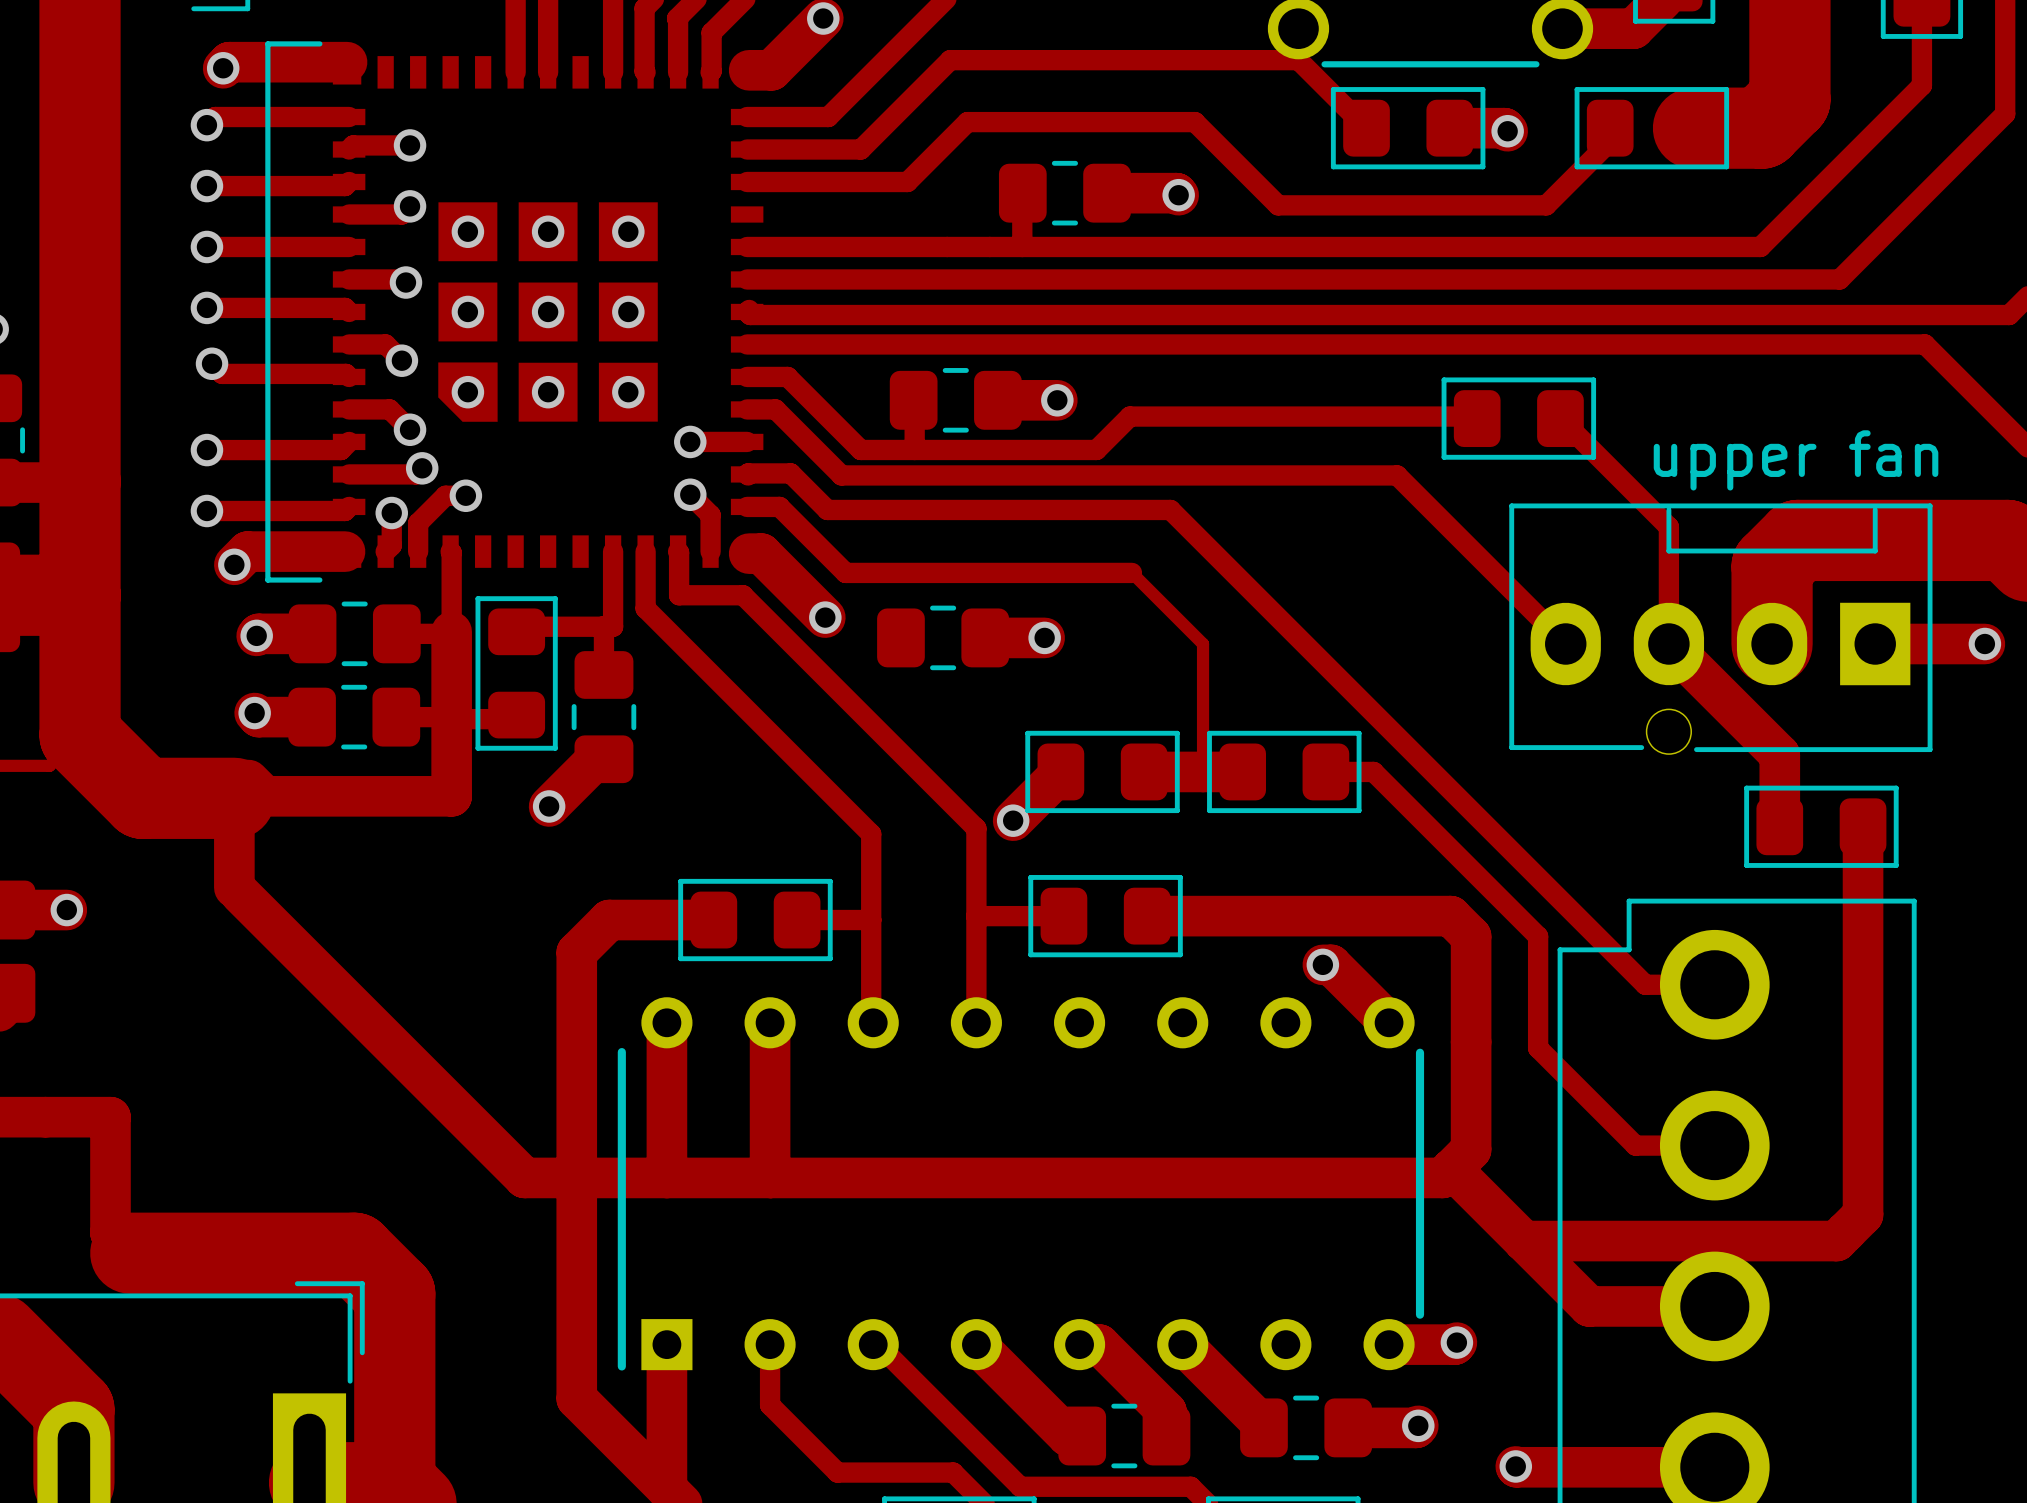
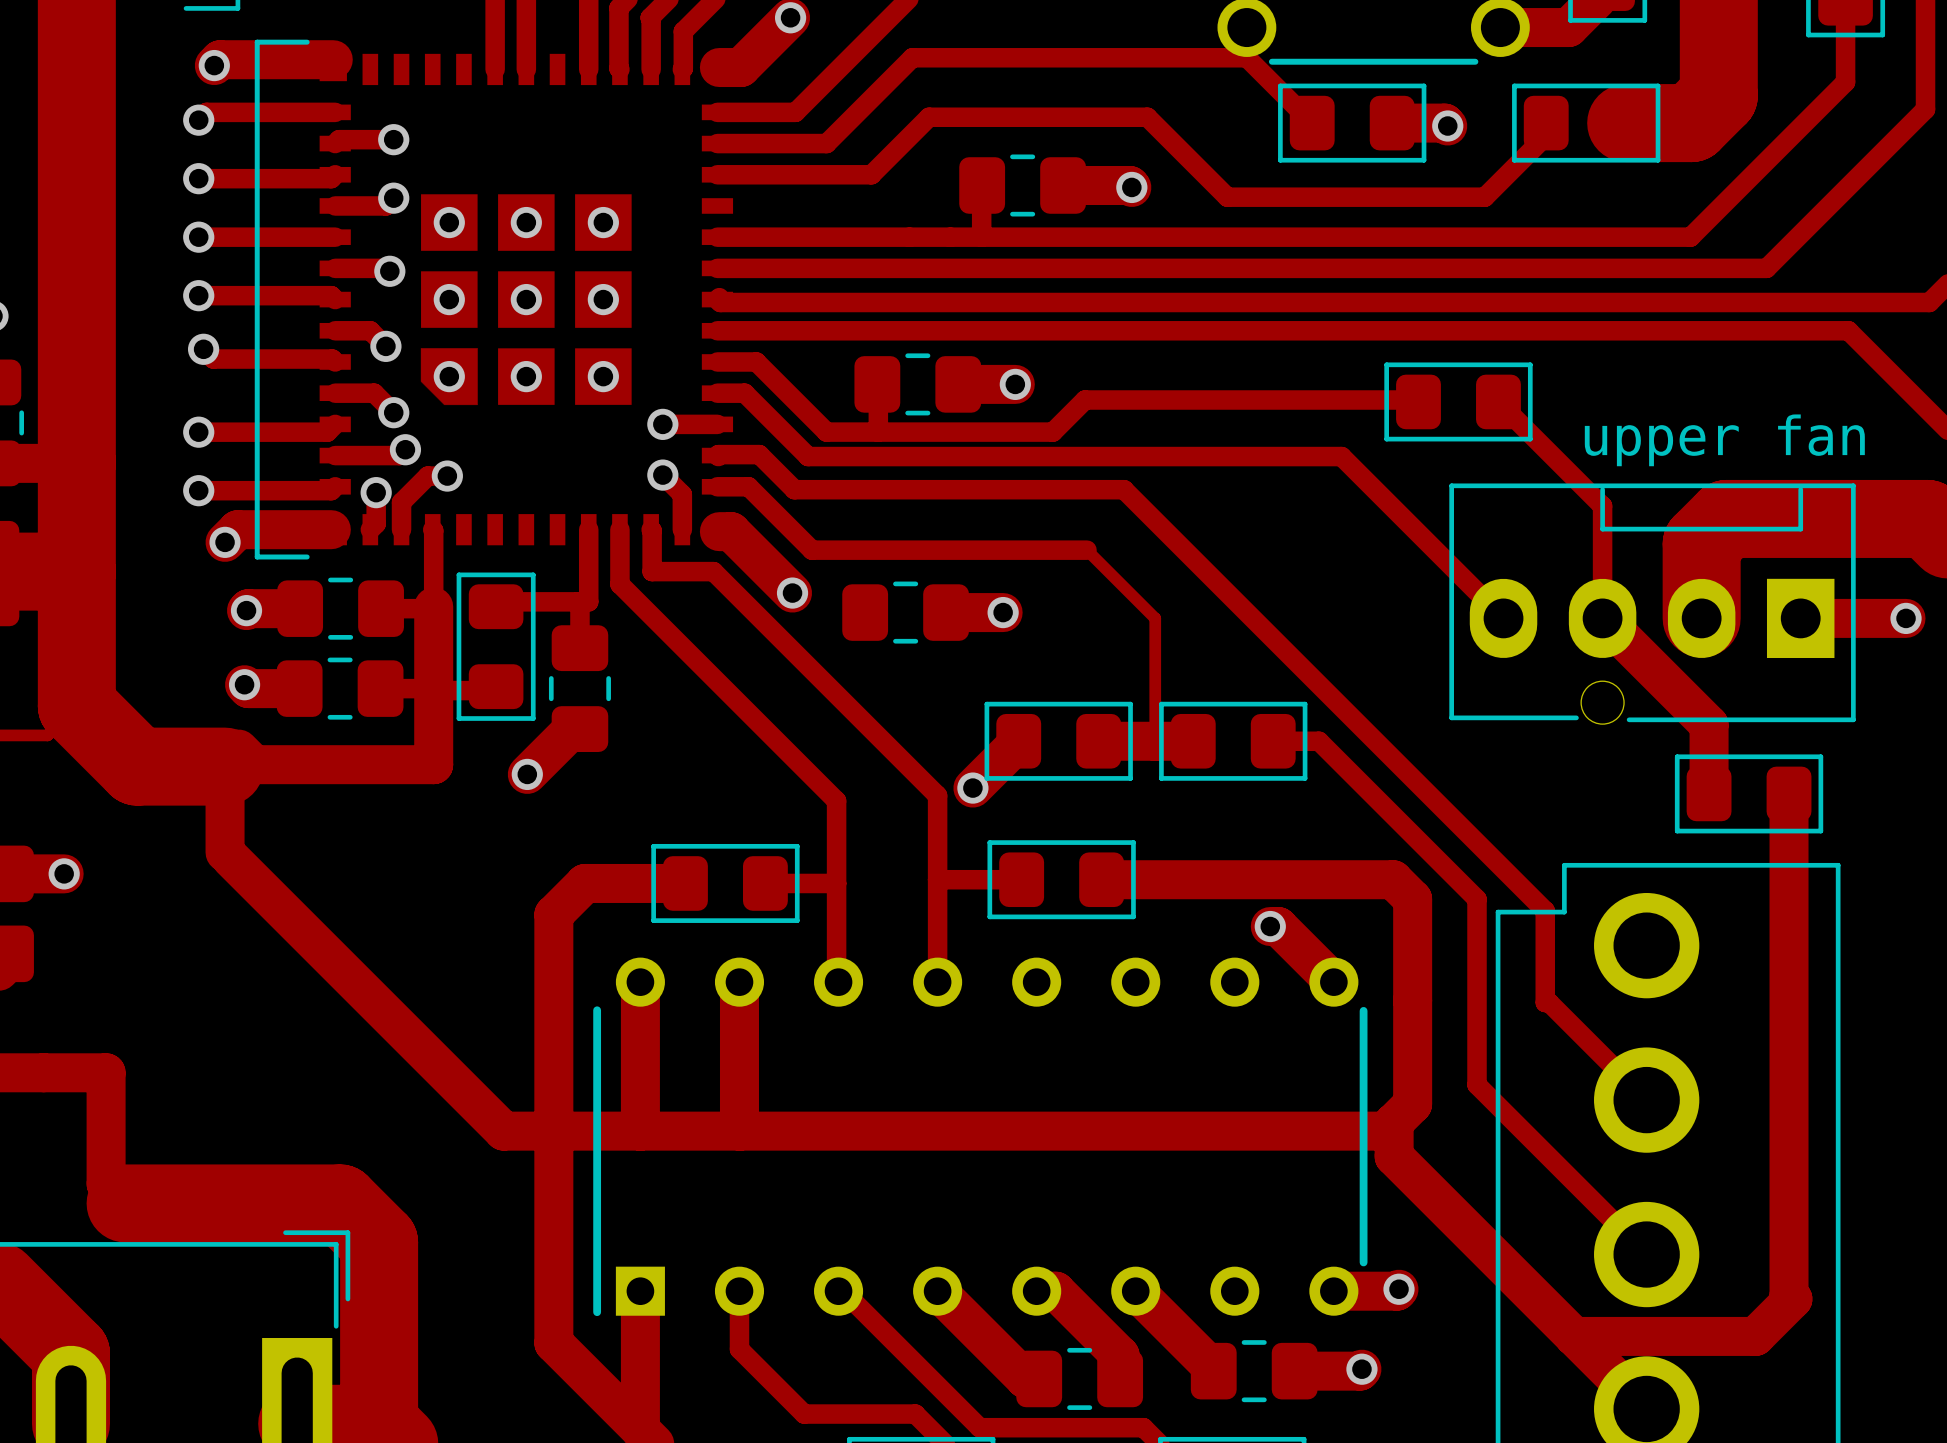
track: (1609, 948) (1645, 984) (1714, 984) -> none
track: (1538, 1048) (1635, 1145) (1714, 1145) -> (1545, 910) (1545, 1002) (1549, 1002) (1646, 1100)
track: (1451, 1168) (1589, 1306) (1714, 1306) -> (1477, 1006) (1477, 1084) (1646, 1254)
track: (1863, 1214) (1836, 1241) (1523, 1241) -> (1789, 1166) (1789, 1295) (1792, 1298) (1755, 1336) (1574, 1336)
track: (1515, 1466) (1714, 1467) -> (1394, 1122) (1394, 1156) (1646, 1408)
via: (1515, 1466) -> none

